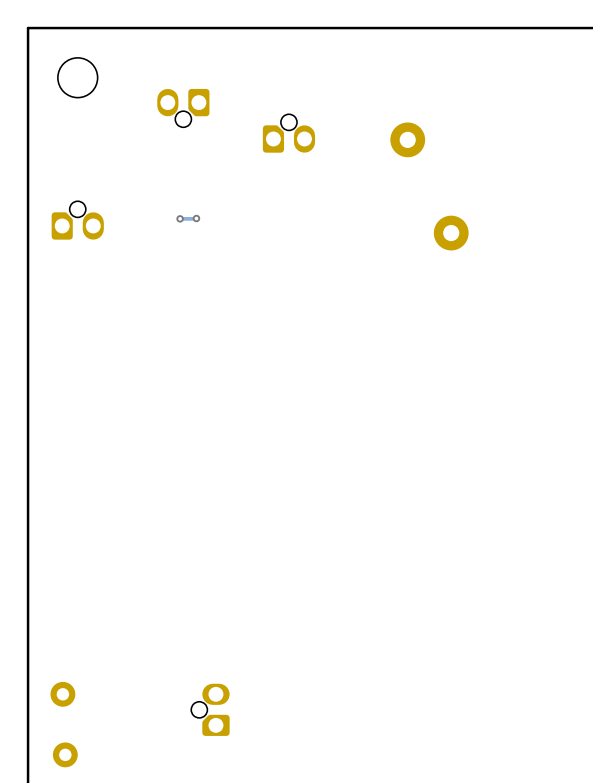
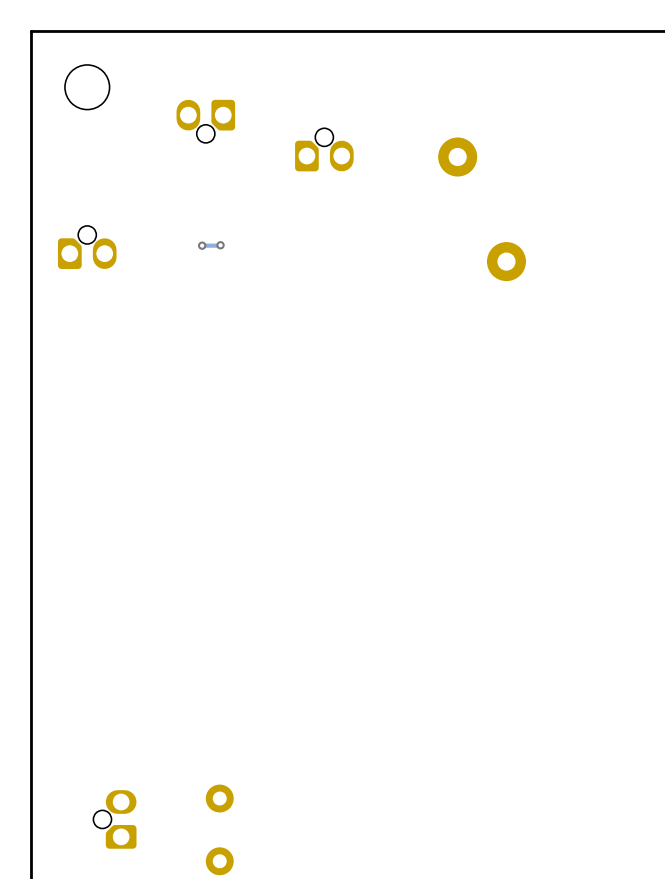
part: (62, 694) -> none
part position: (210, 709) -> (114, 819)
part: none -> (219, 798)
part: (65, 754) -> none
part: none -> (219, 861)

